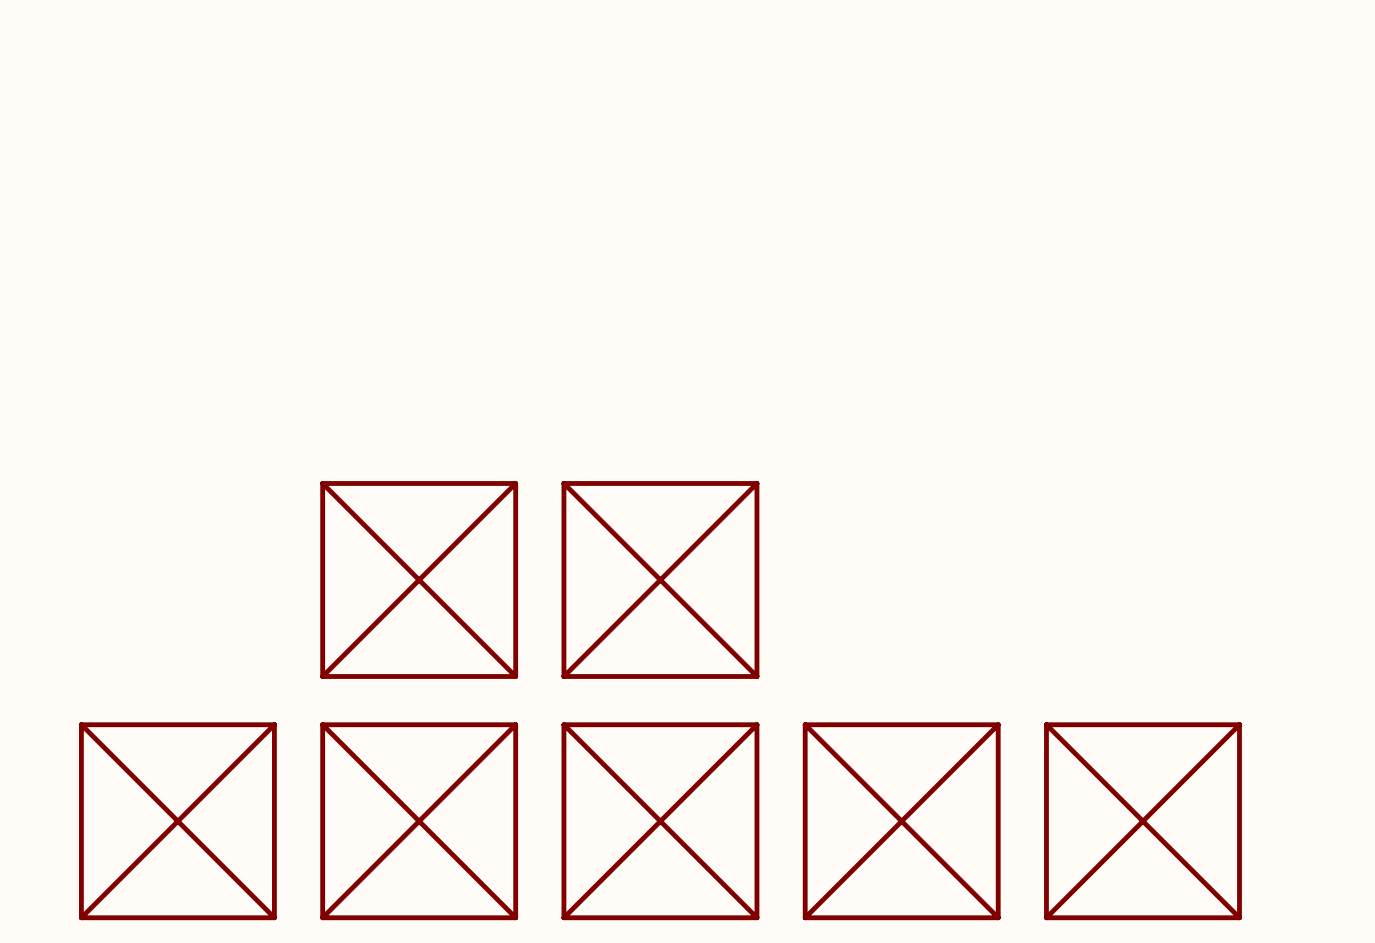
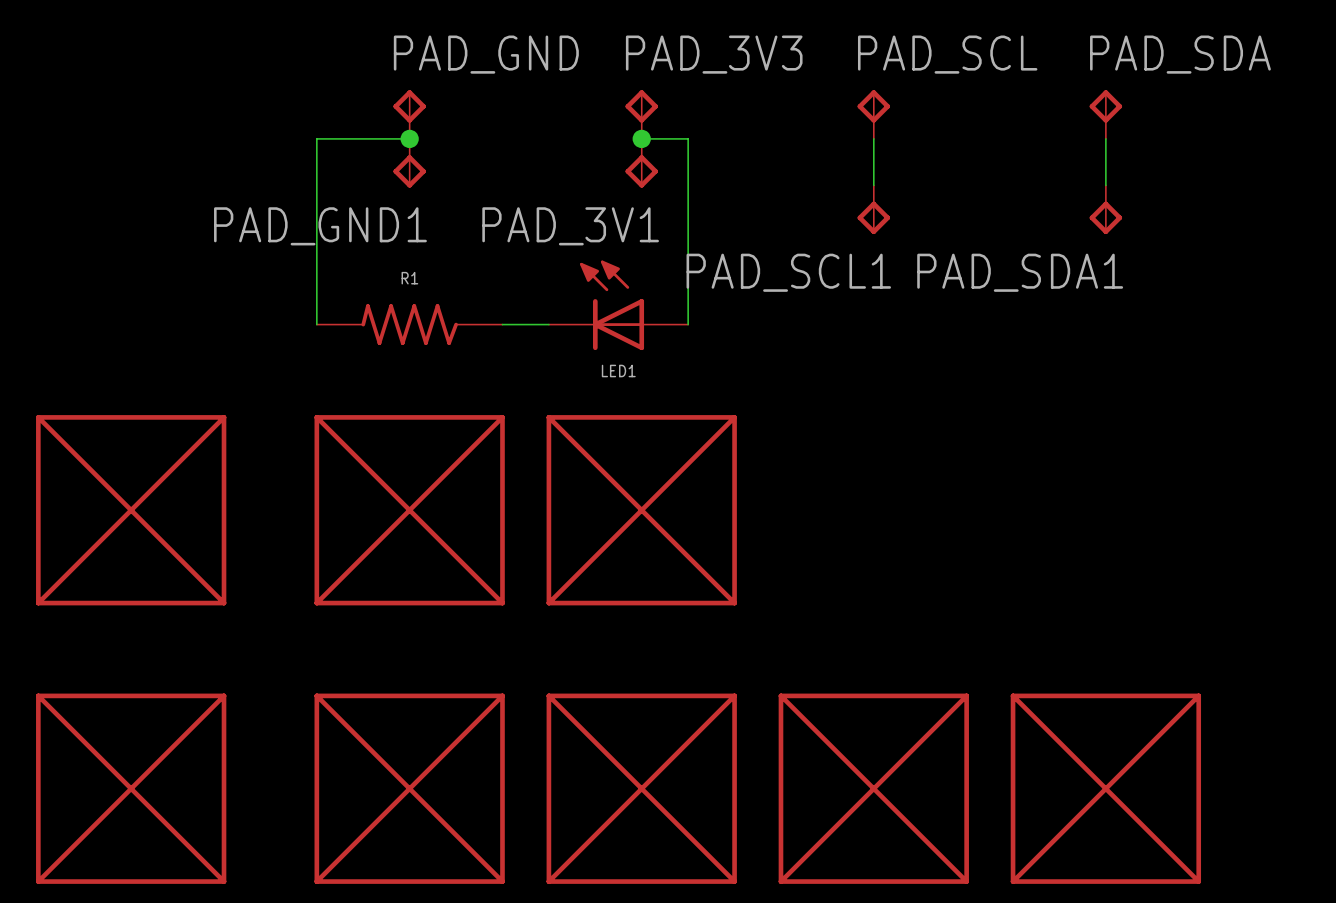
PAD_GND: none -> (409, 114)
PAD_3V3: none -> (641, 114)
PAD_SCL: none -> (873, 114)
PAD_SDA: none -> (1105, 114)
wire: none -> (409, 138) (316, 138) (316, 324)
junction: none -> (409, 138)
wire: none -> (641, 138) (688, 138) (688, 324)
junction: none -> (641, 138)
wire: none -> (873, 138) (873, 185)
wire: none -> (1105, 138) (1105, 185)
PAD_GND1: none -> (409, 163)
PAD_3V1: none -> (641, 163)
PAD_SCL1: none -> (873, 209)
PAD_SDA1: none -> (1105, 209)
LED1: none -> (618, 305)
R1: none -> (409, 324)
wire: none -> (502, 324) (548, 324)
part: none -> (131, 510)
part position: (419, 579) -> (409, 510)
part position: (660, 579) -> (641, 510)
part position: (177, 821) -> (131, 788)

